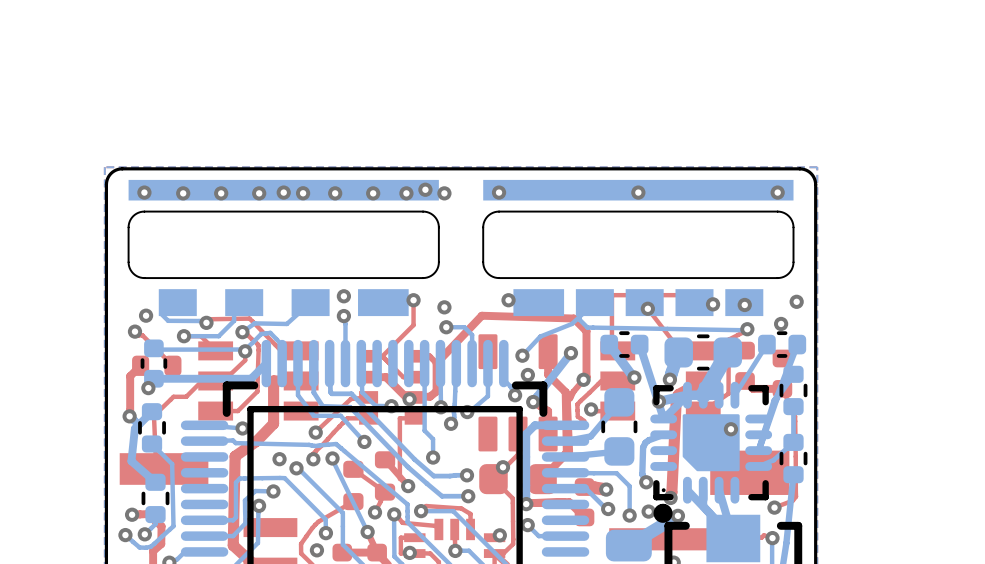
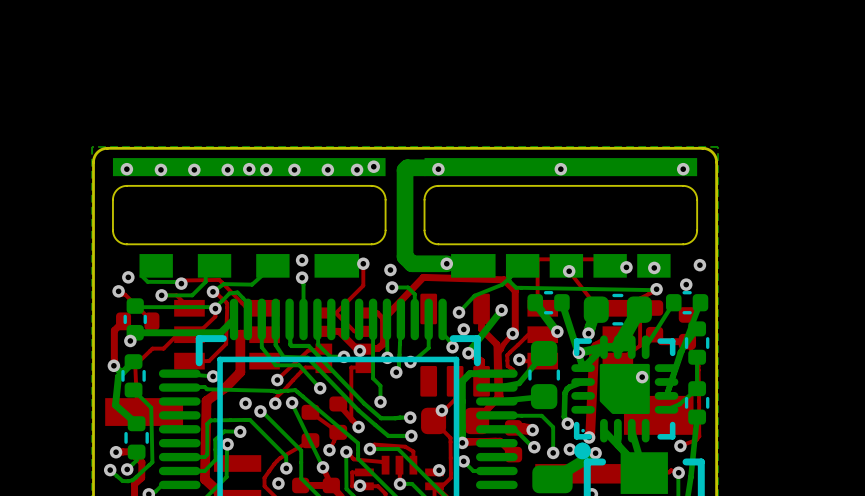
bottom track: none -> (424, 167) (407, 167) (405, 170) (405, 256) (412, 263) (446, 263)
via: (444, 193) -> none

